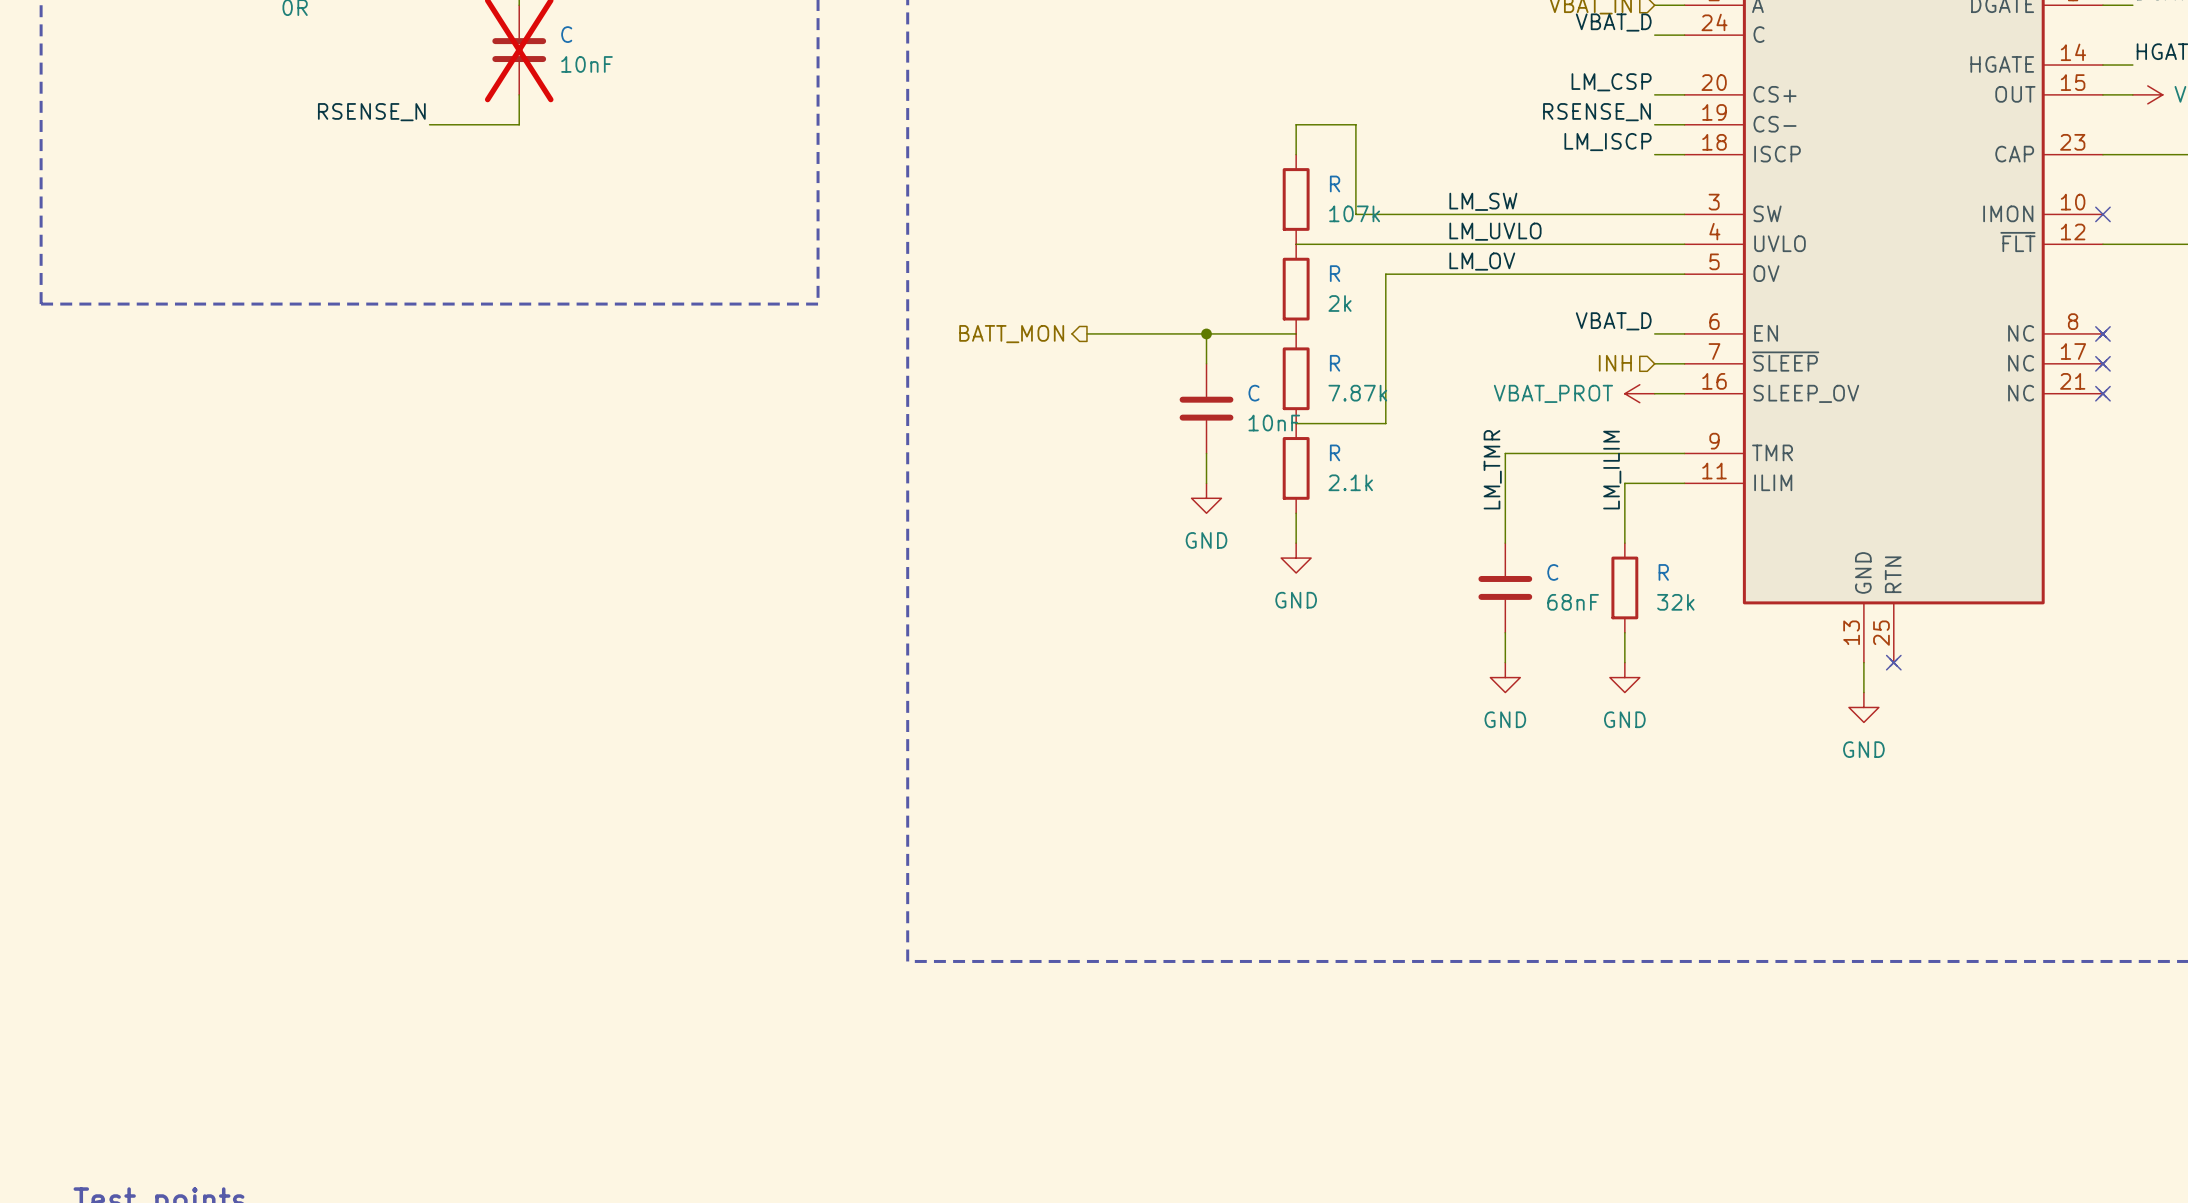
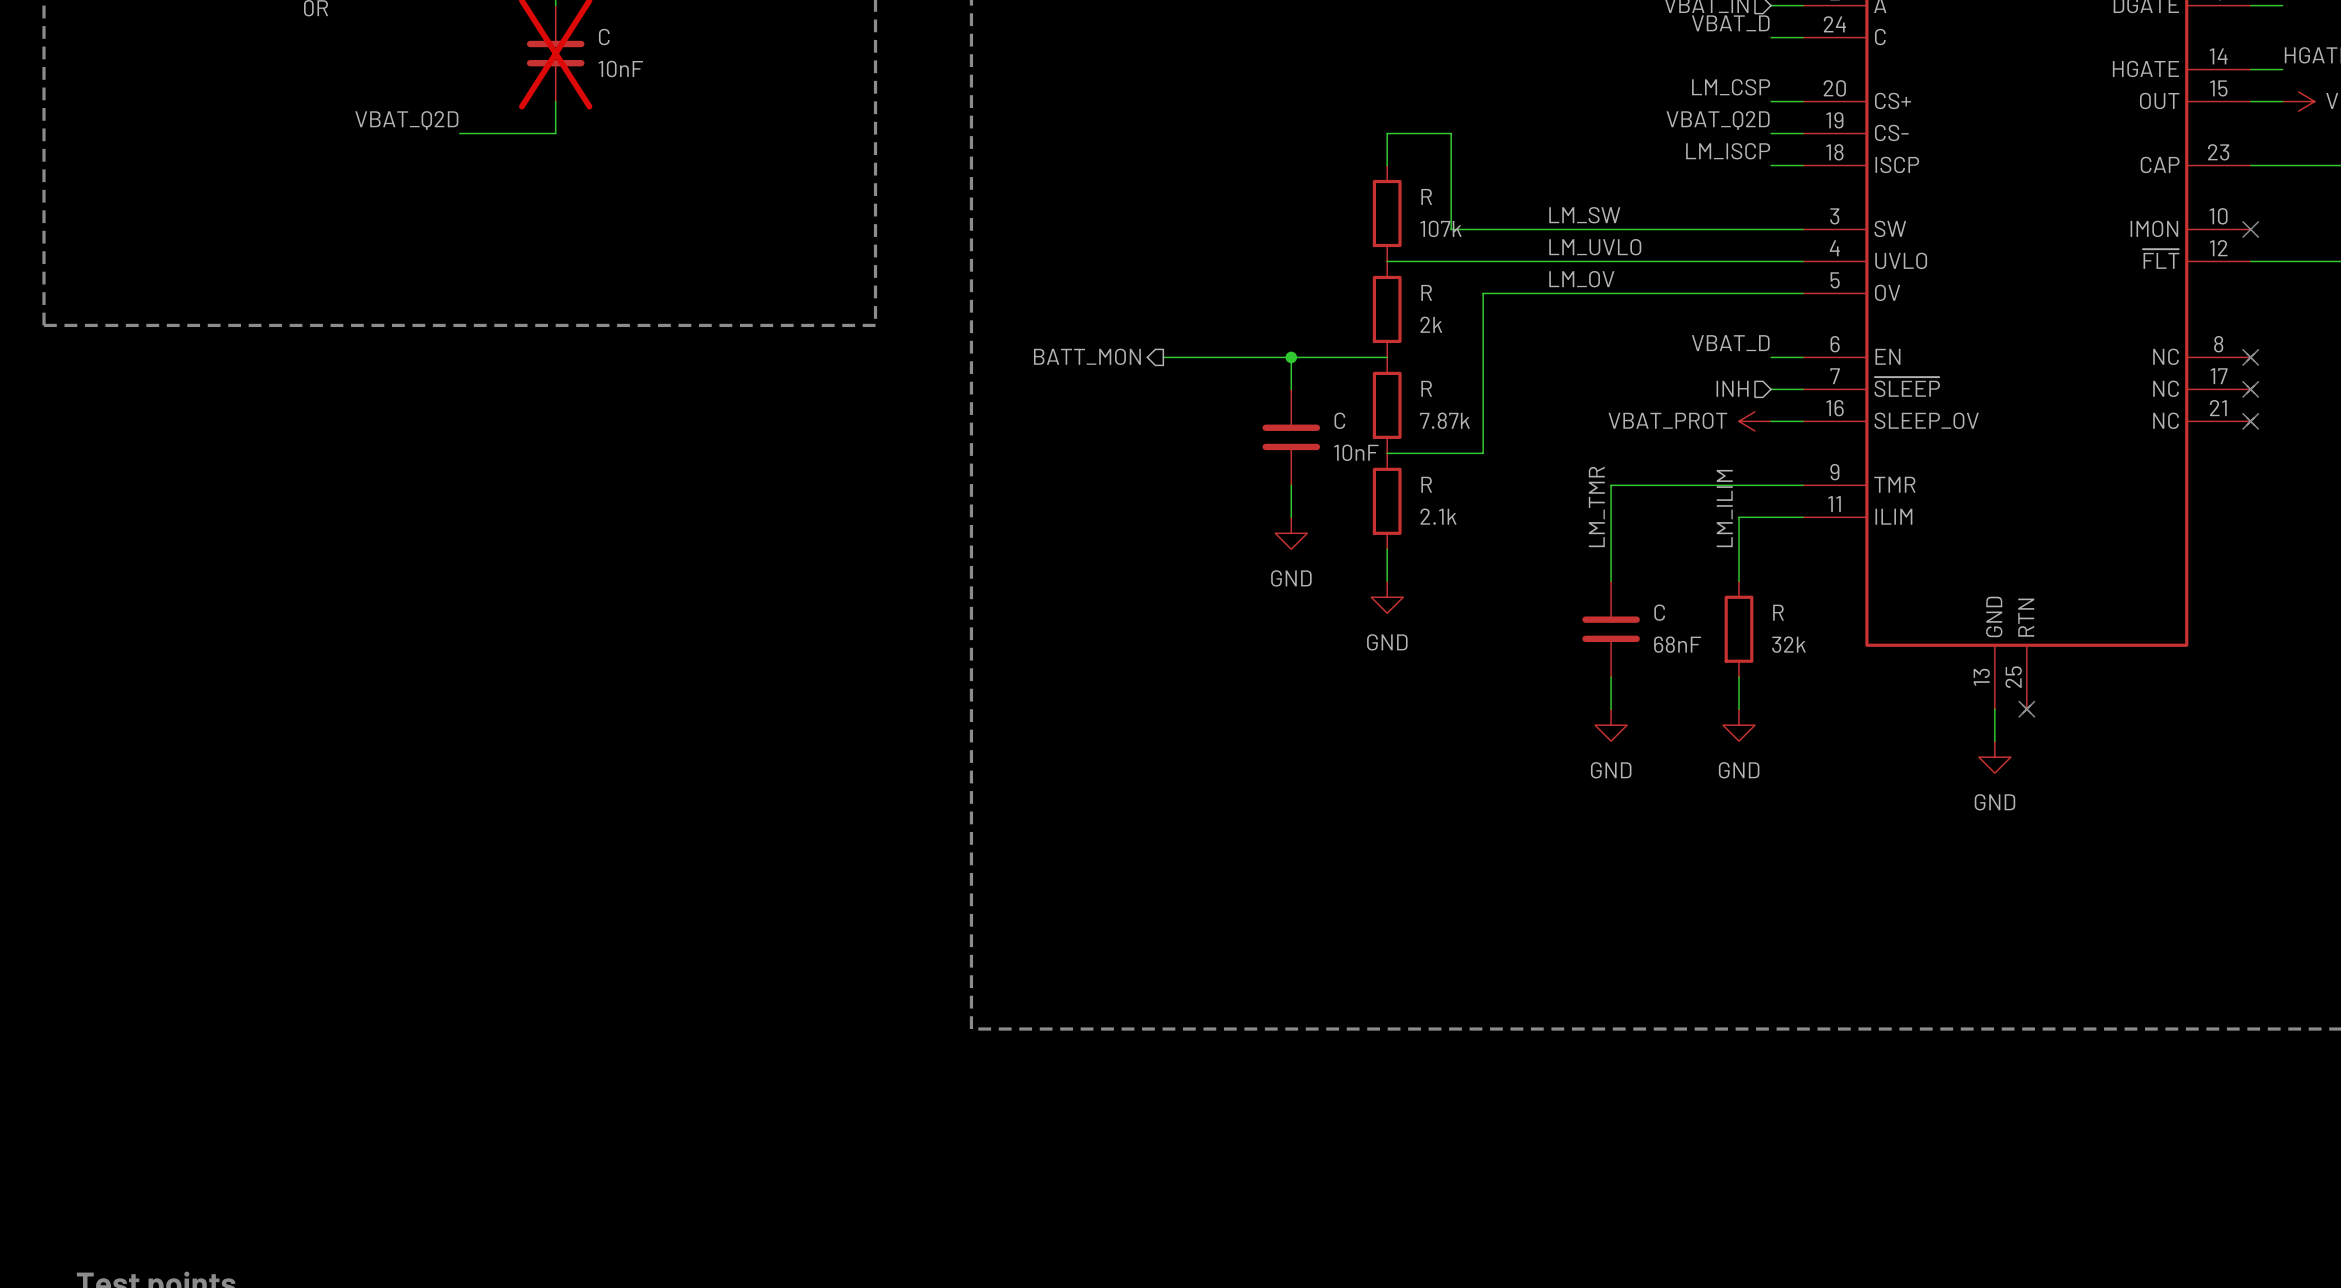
label: RSENSE_N (371, 112) -> VBAT_Q2D (406, 120)
label: RSENSE_N (1596, 112) -> VBAT_Q2D (1718, 120)

